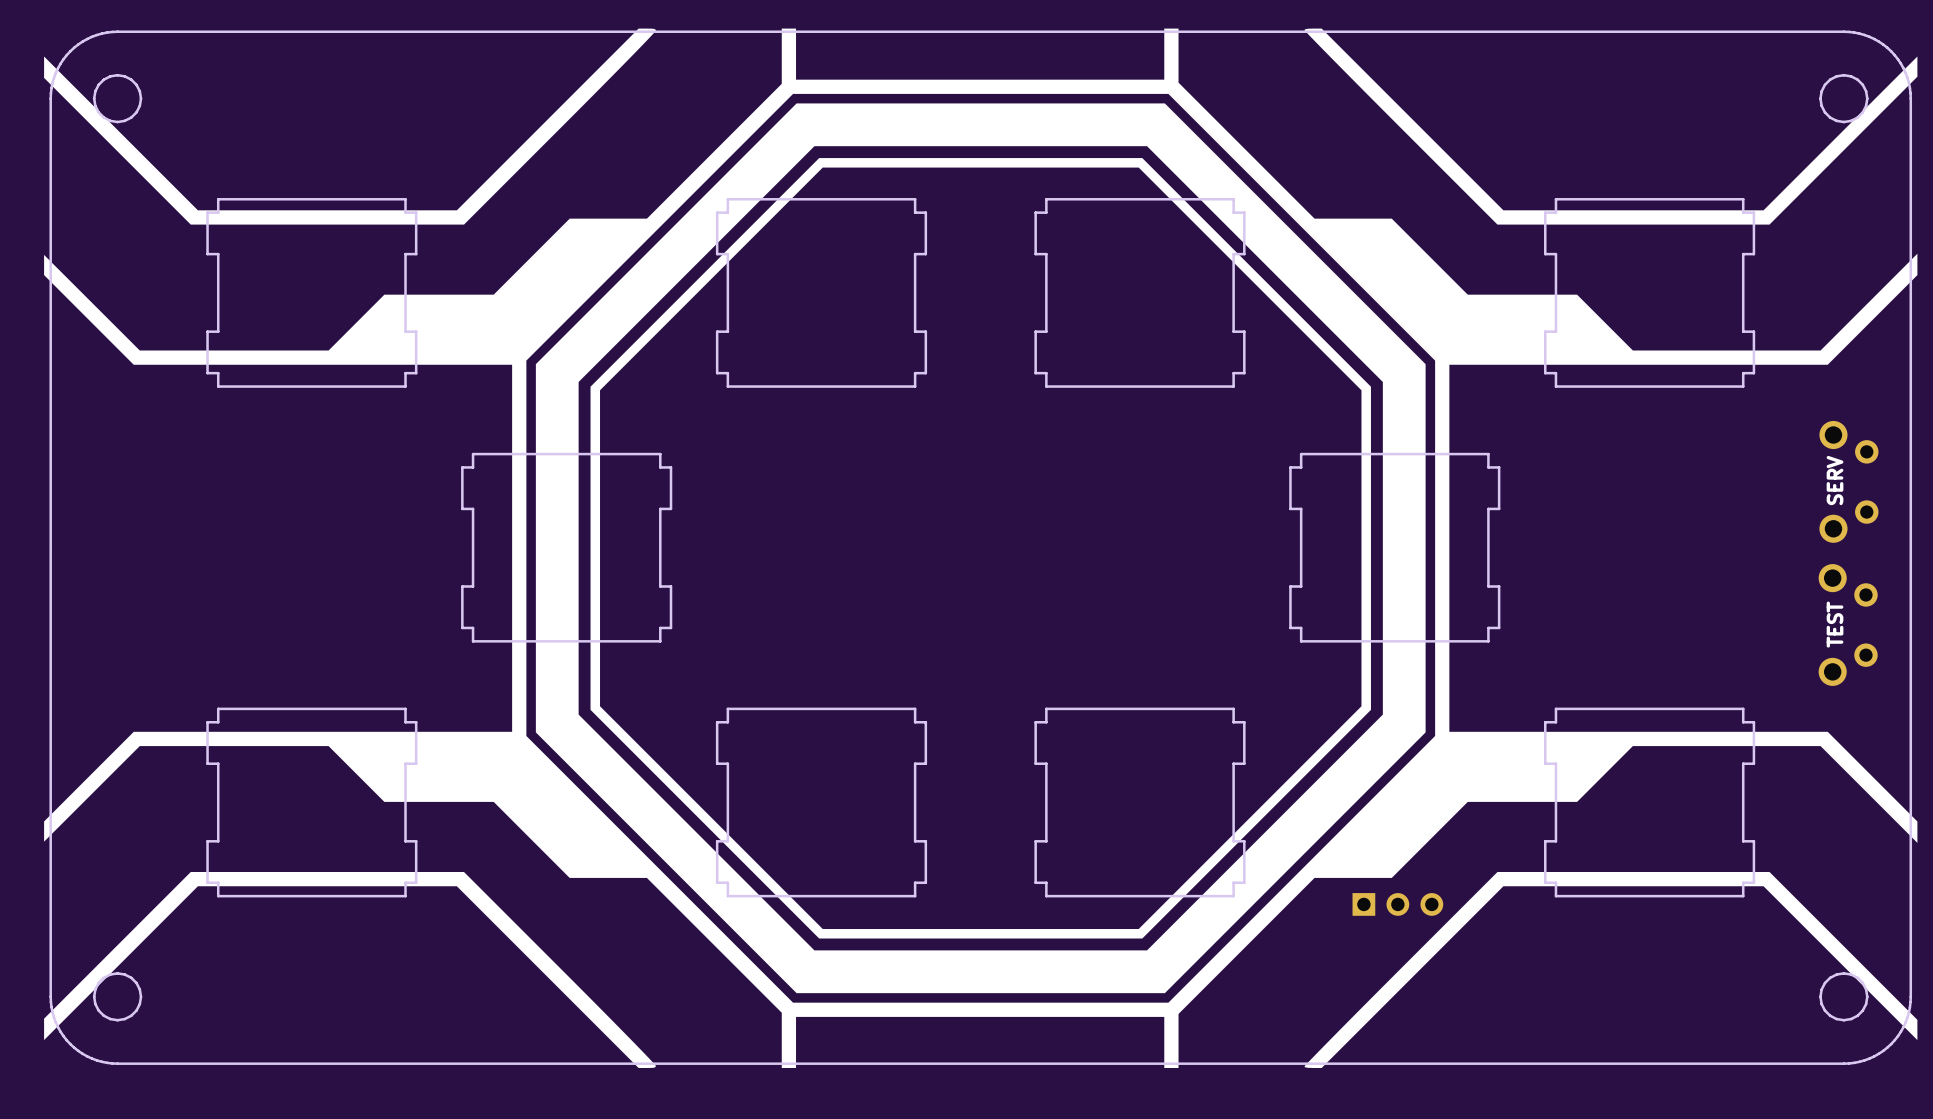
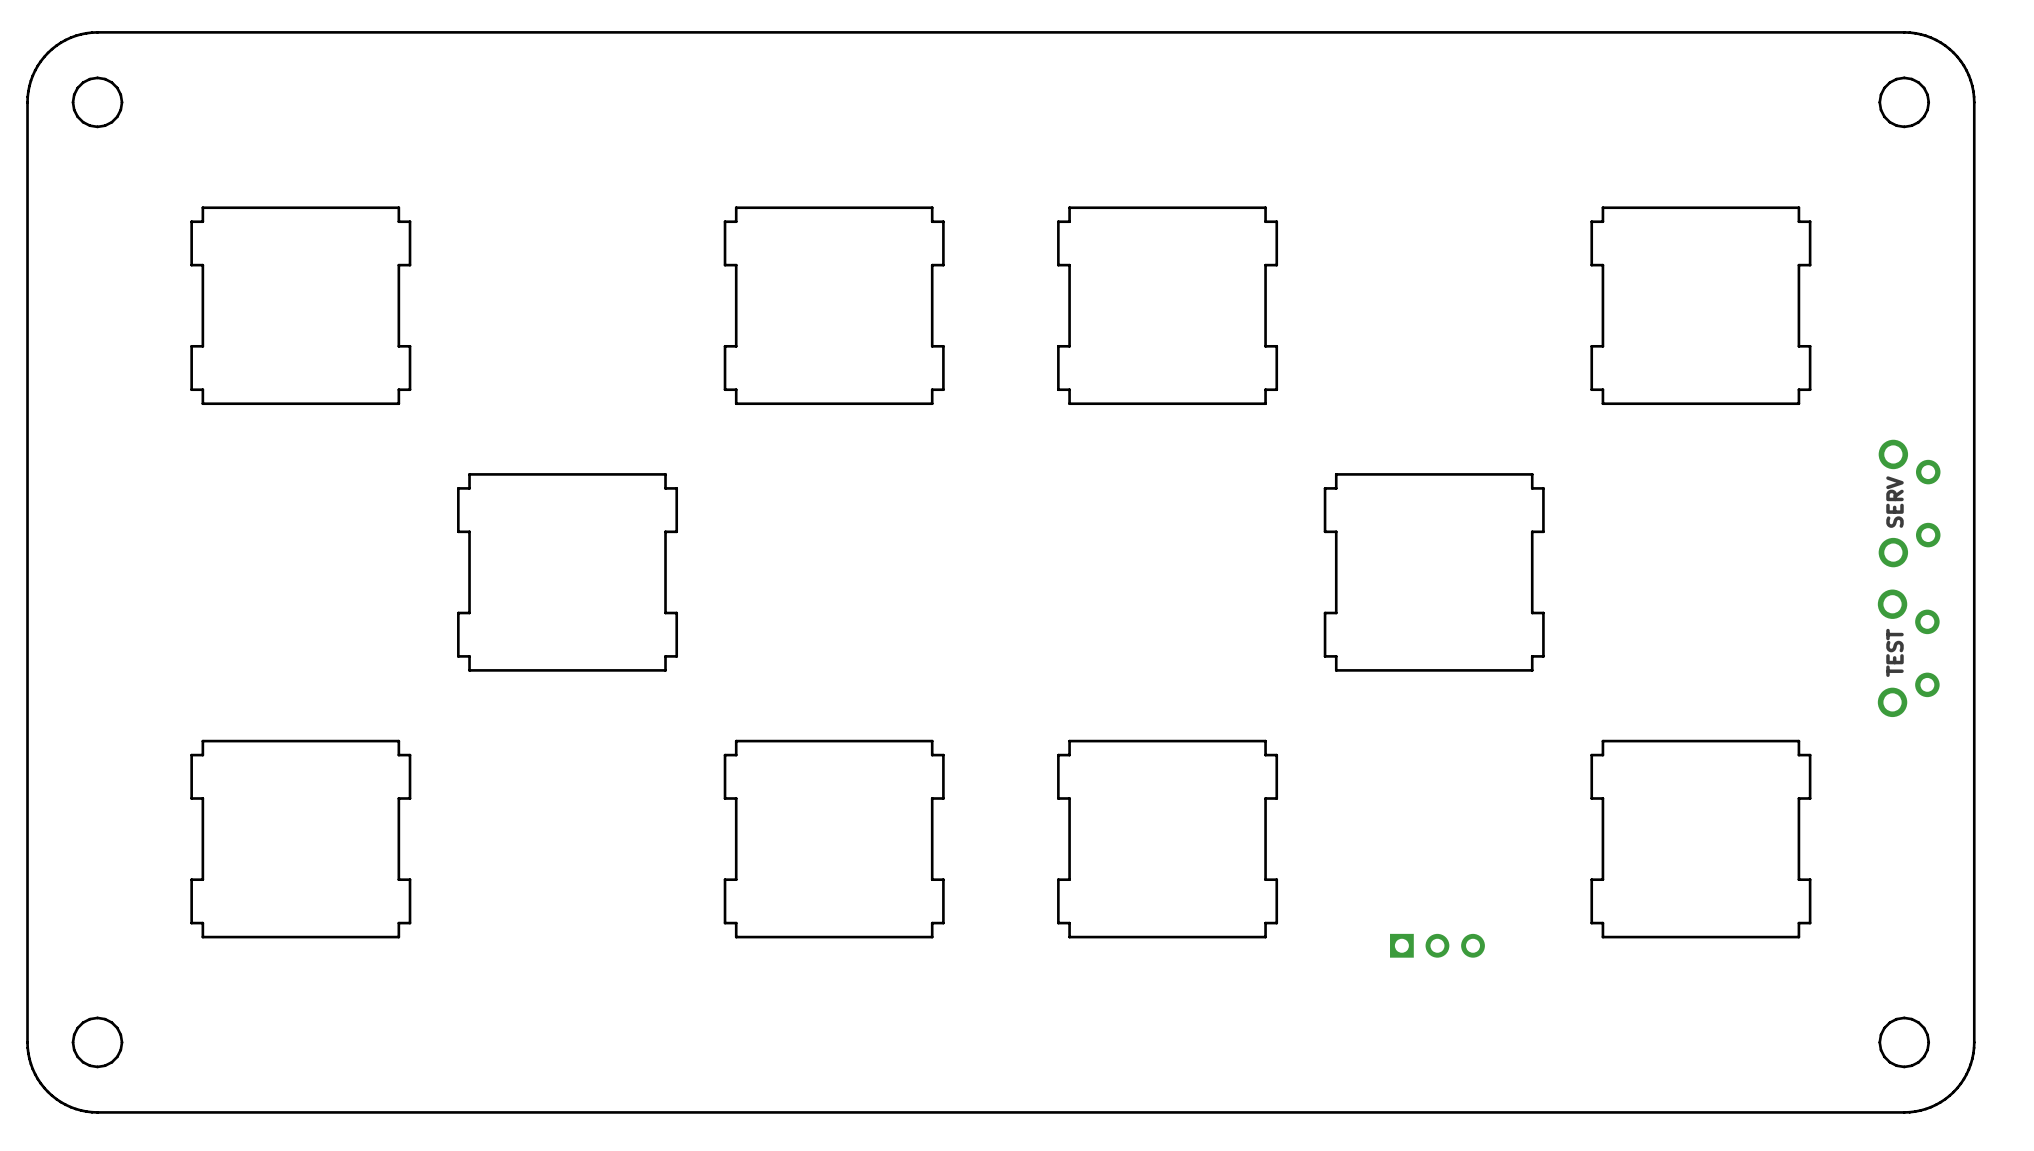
drawing: [44, 28, 1918, 1068] -> none

